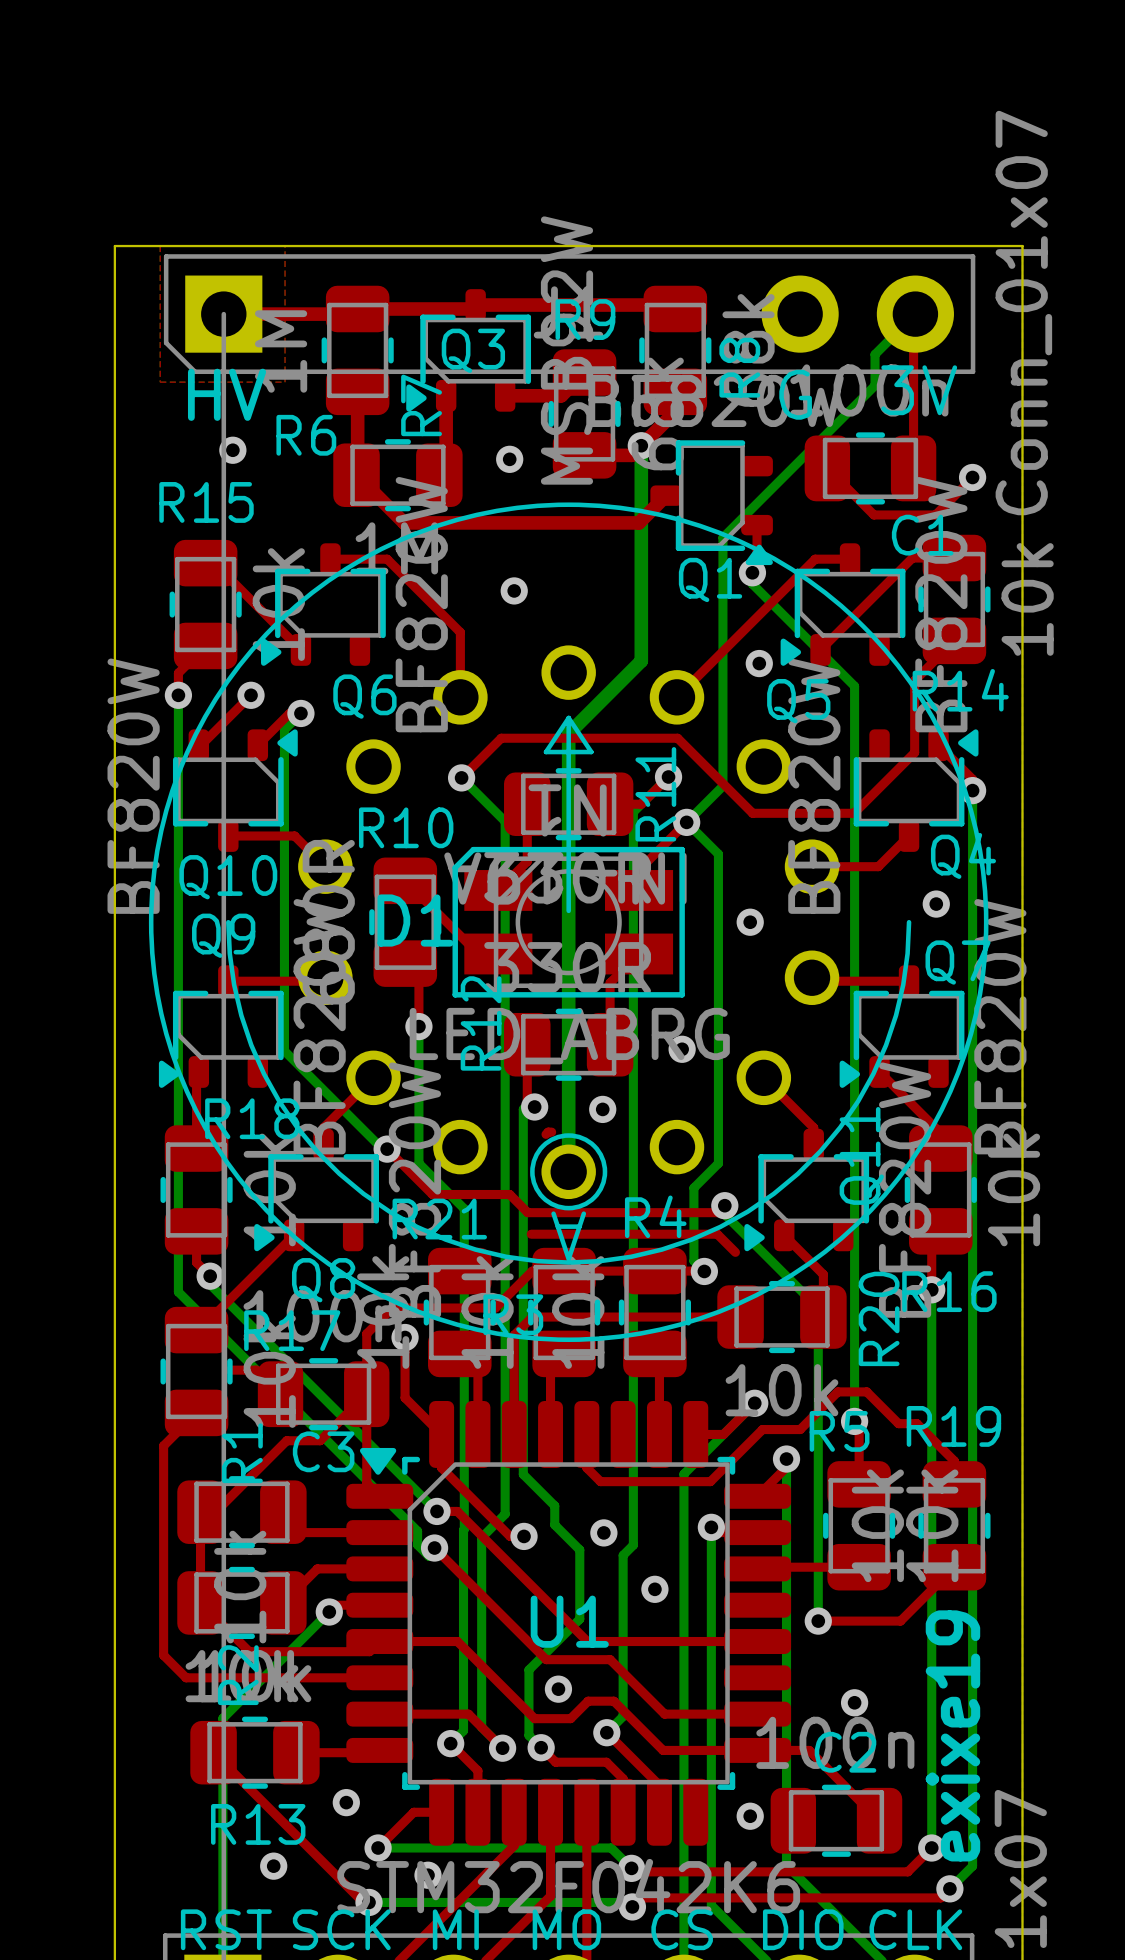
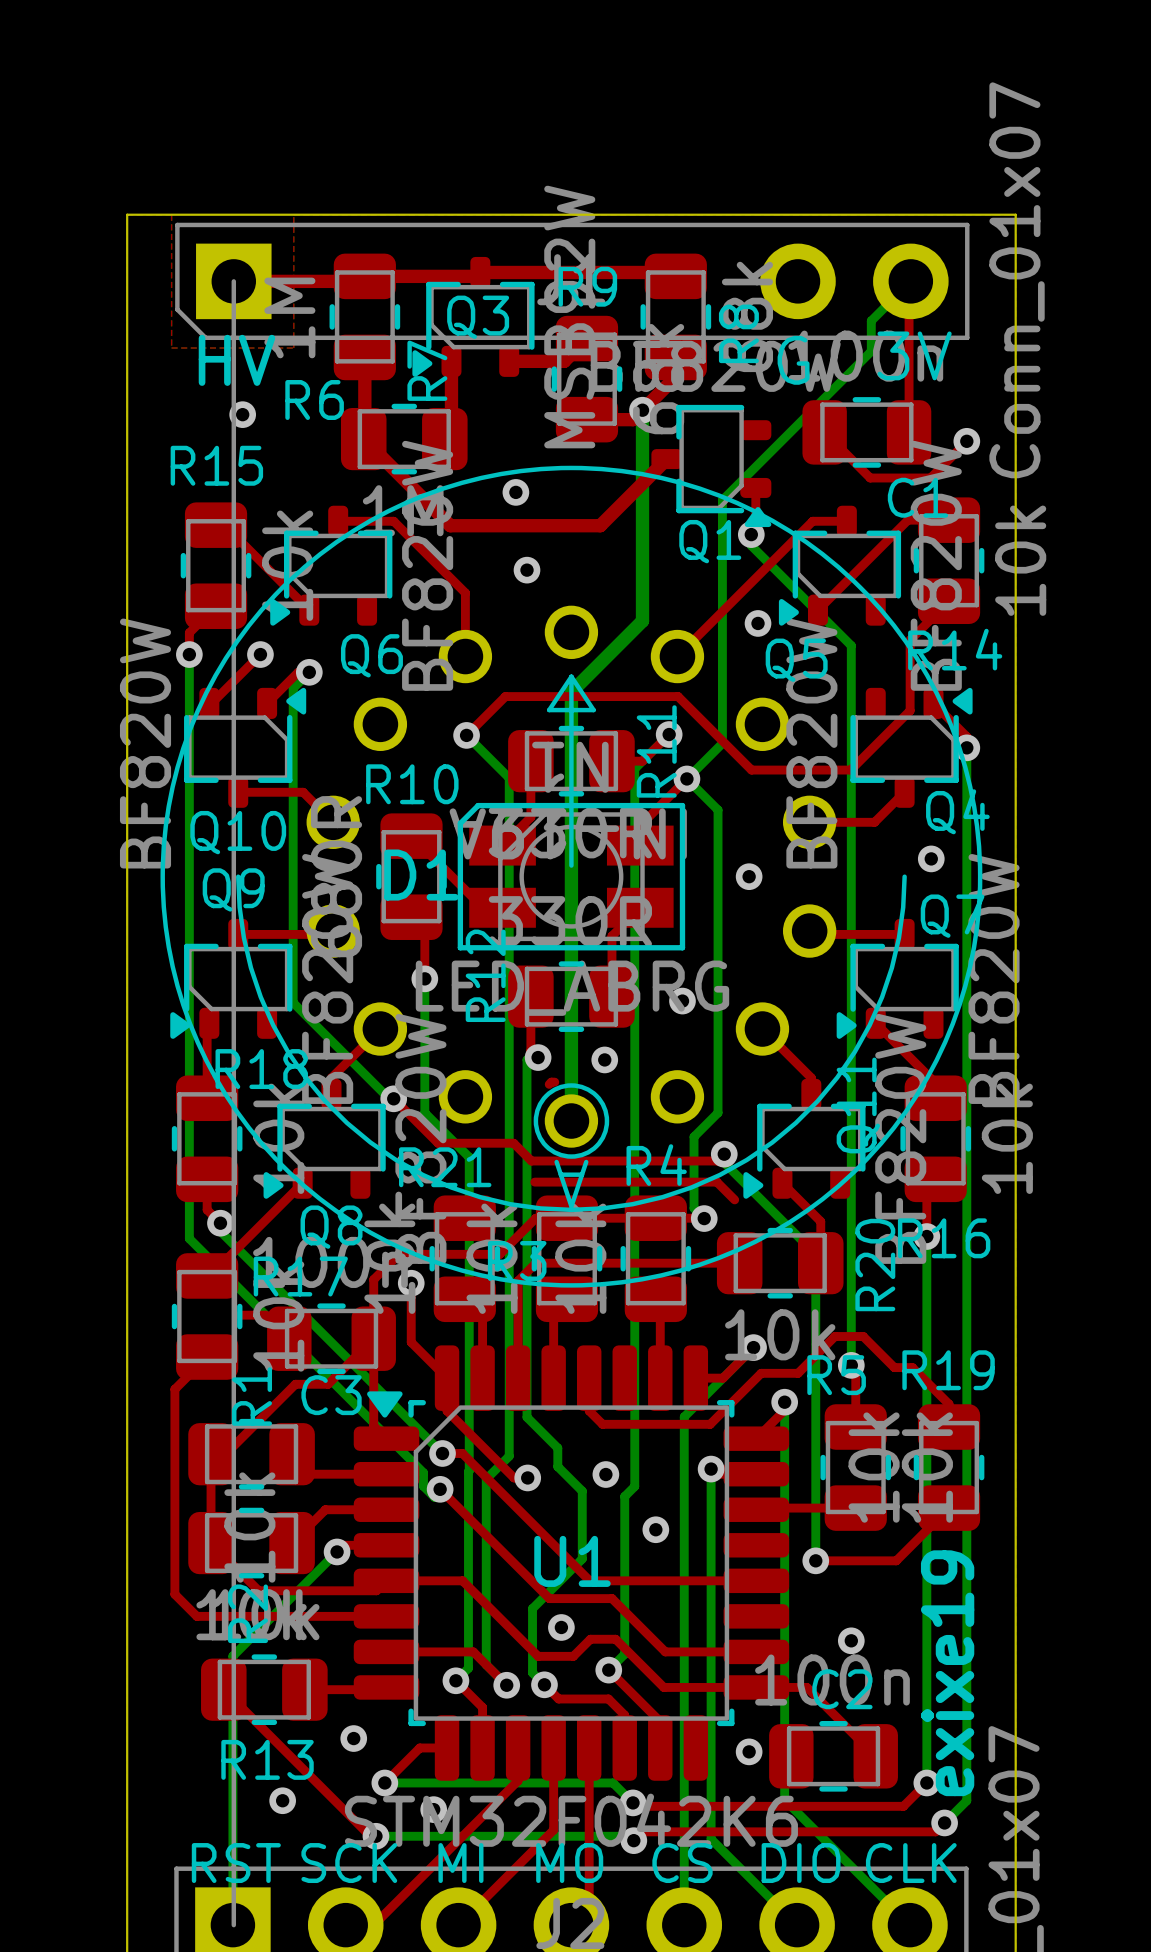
via: (509, 459) -> none
top track: (404, 522) (638, 522) -> (410, 485) (450, 525) (600, 525) (640, 485)
via: none -> (515, 492)
via position: (514, 590) -> (527, 570)

